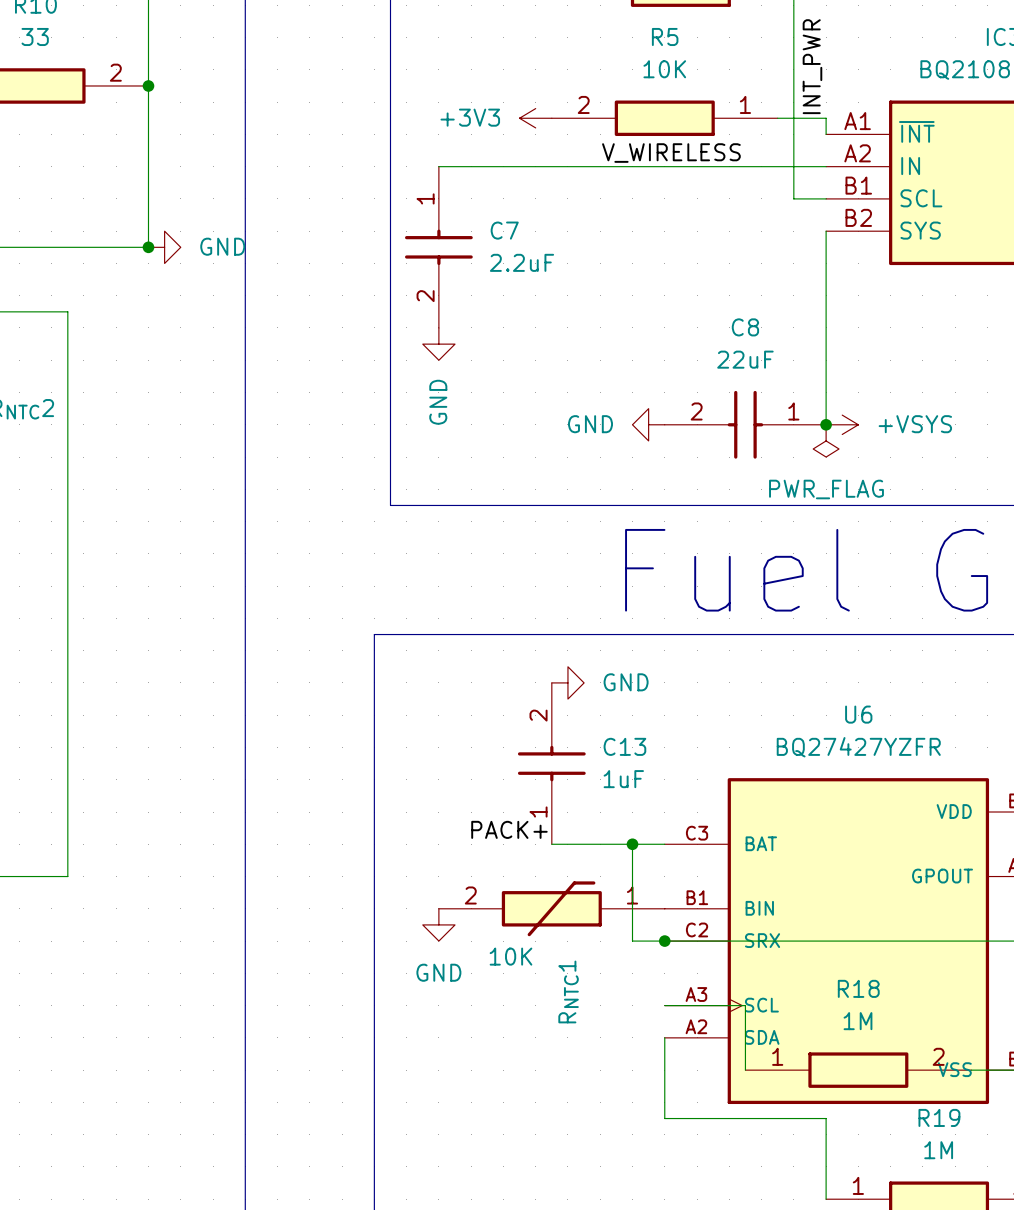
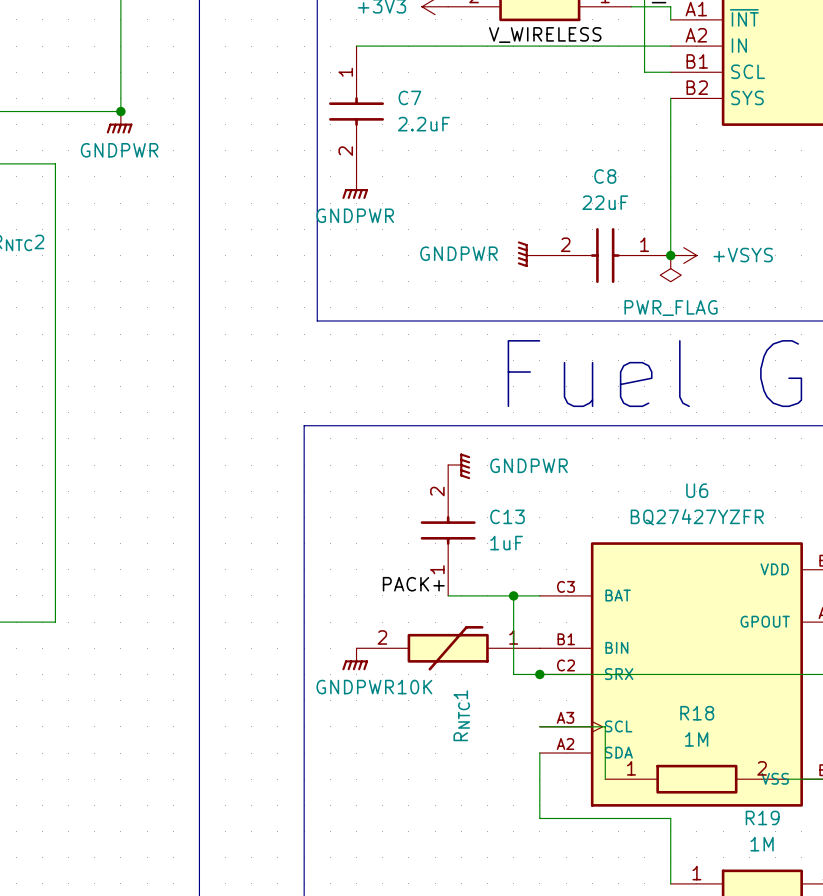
power symbol: GND (164, 247) -> none
power symbol: none -> GNDPWR (119, 122)
power symbol: GND (438, 344) -> GNDPWR (355, 187)
power symbol: GND (648, 424) -> GNDPWR (528, 254)
power symbol: GND (567, 682) -> GNDPWR (459, 466)
power symbol: GND (438, 924) -> GNDPWR (355, 659)

